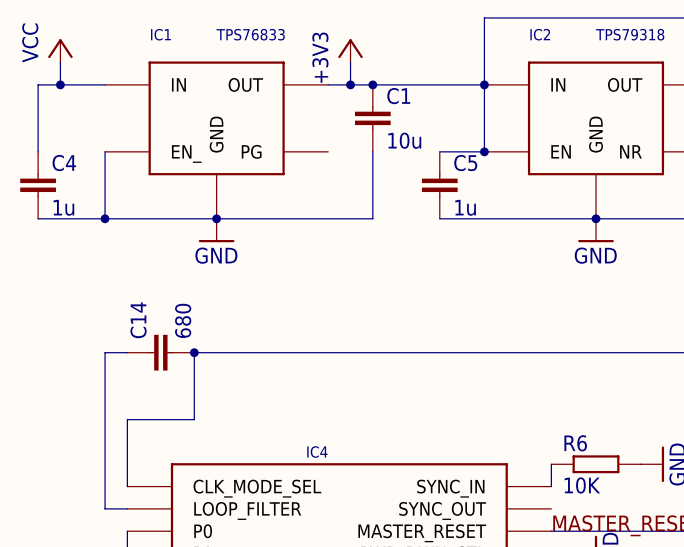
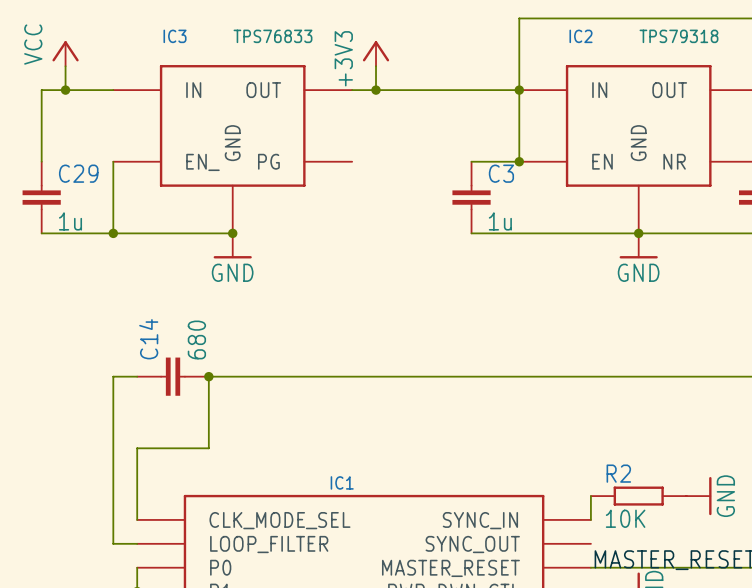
IC1 name: IC1 (160, 34) -> IC3 (175, 36)
junction: (372, 84) -> none
C1: 10u (372, 118) -> none
wire: (372, 151) (372, 218) (216, 218) -> none
C4 name: C4 (64, 163) -> C29 (78, 173)
C5 name: C5 (465, 163) -> C3 (501, 173)
R6 name: R6 (575, 443) -> R2 (618, 473)
IC4 name: IC4 (317, 452) -> IC1 (342, 482)

